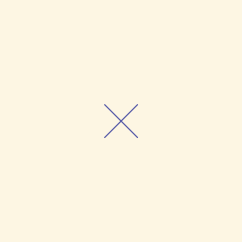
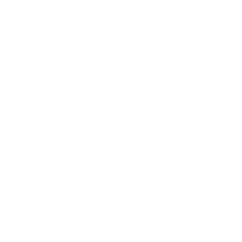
no-connect mark: (121, 121) -> none

